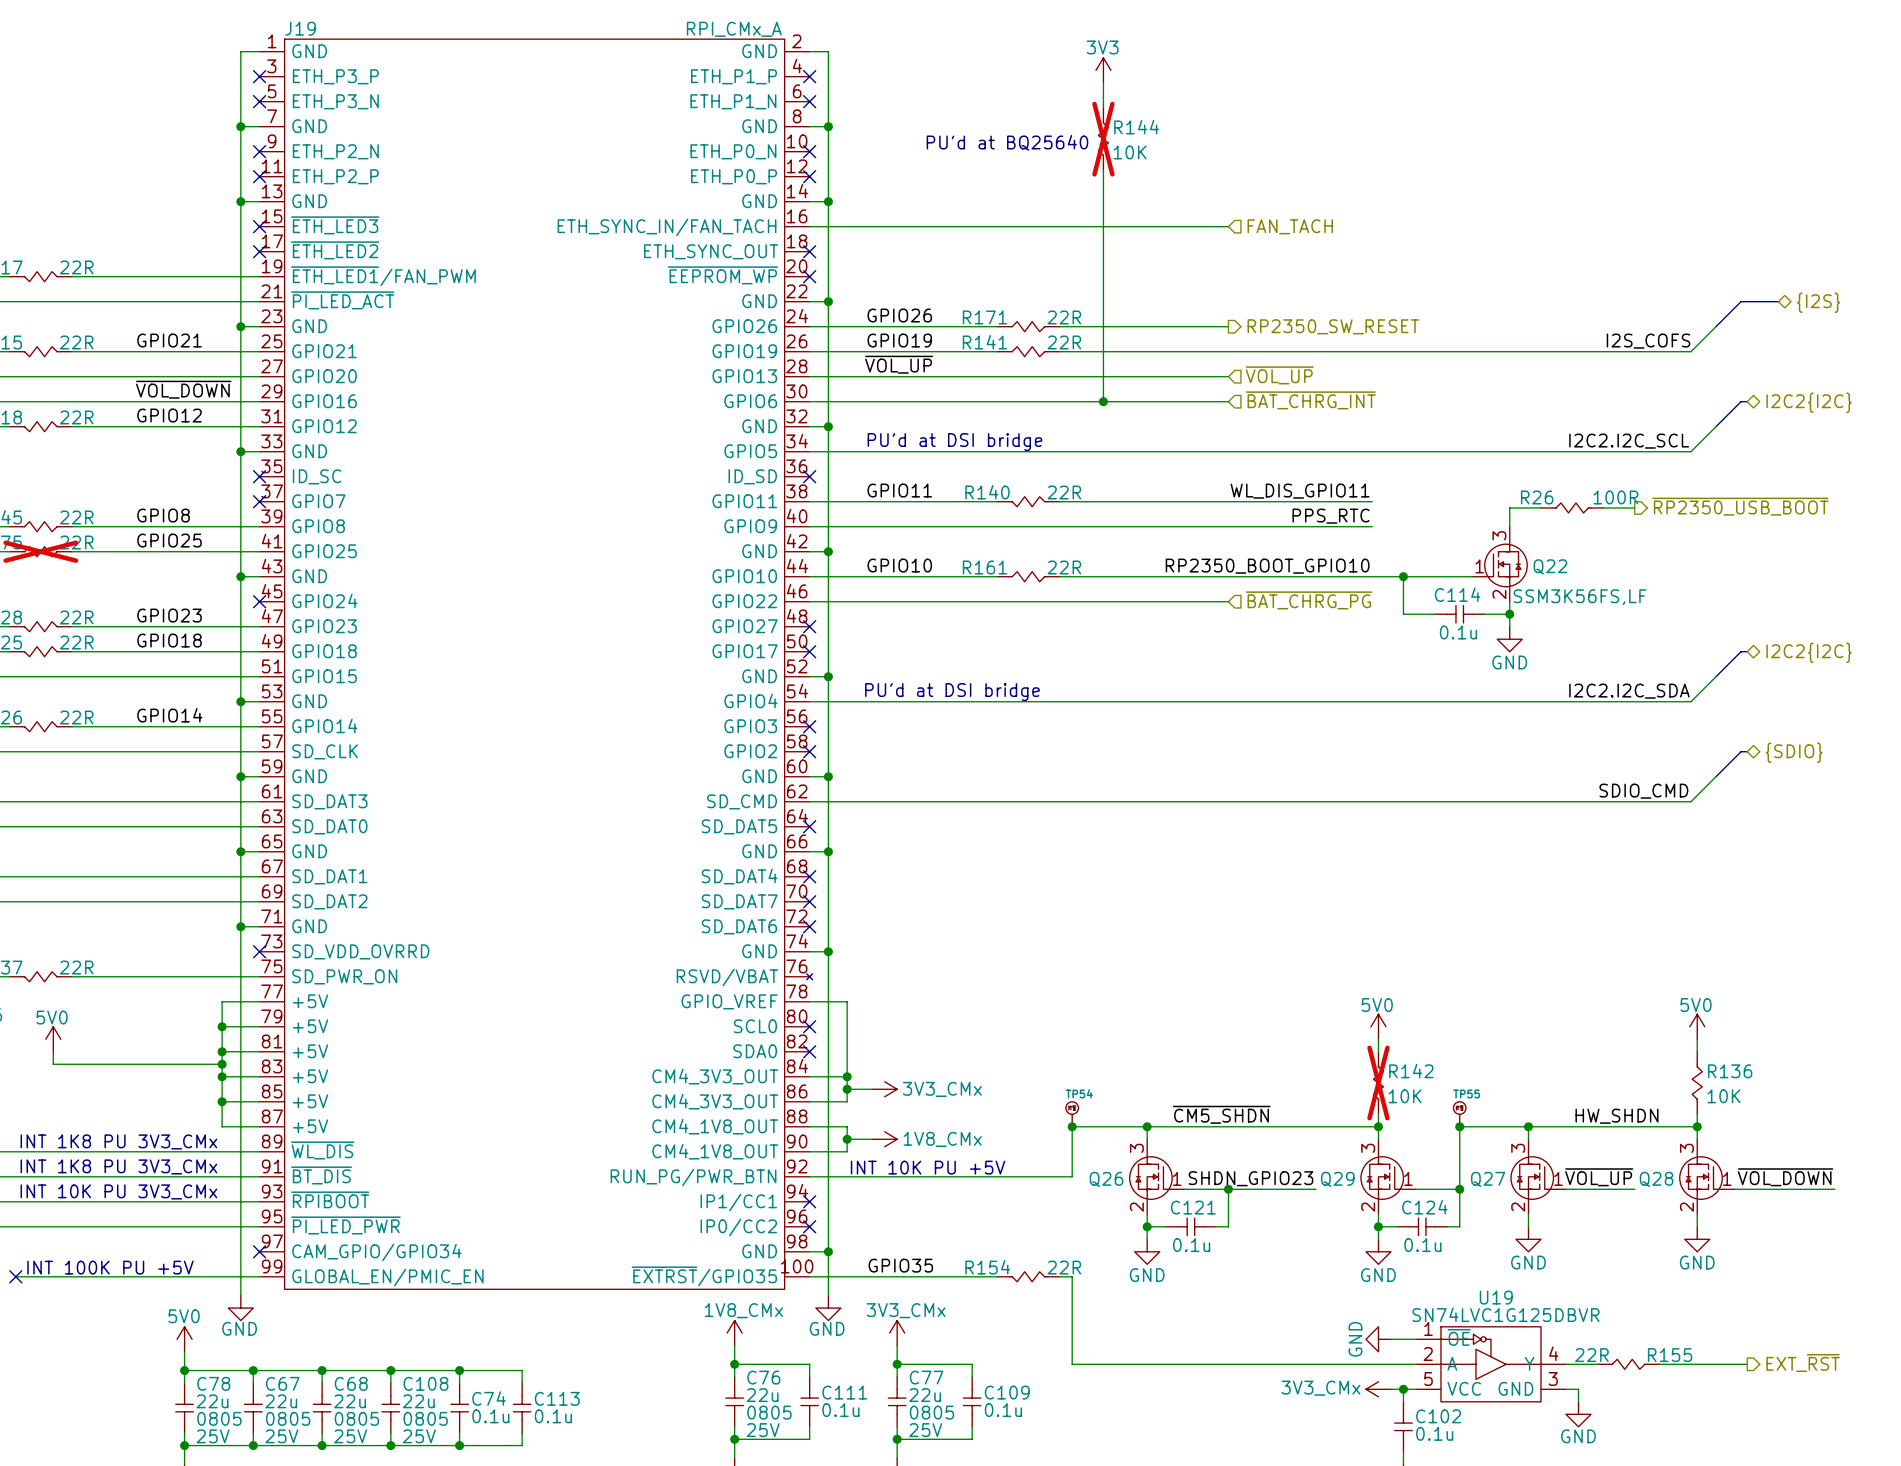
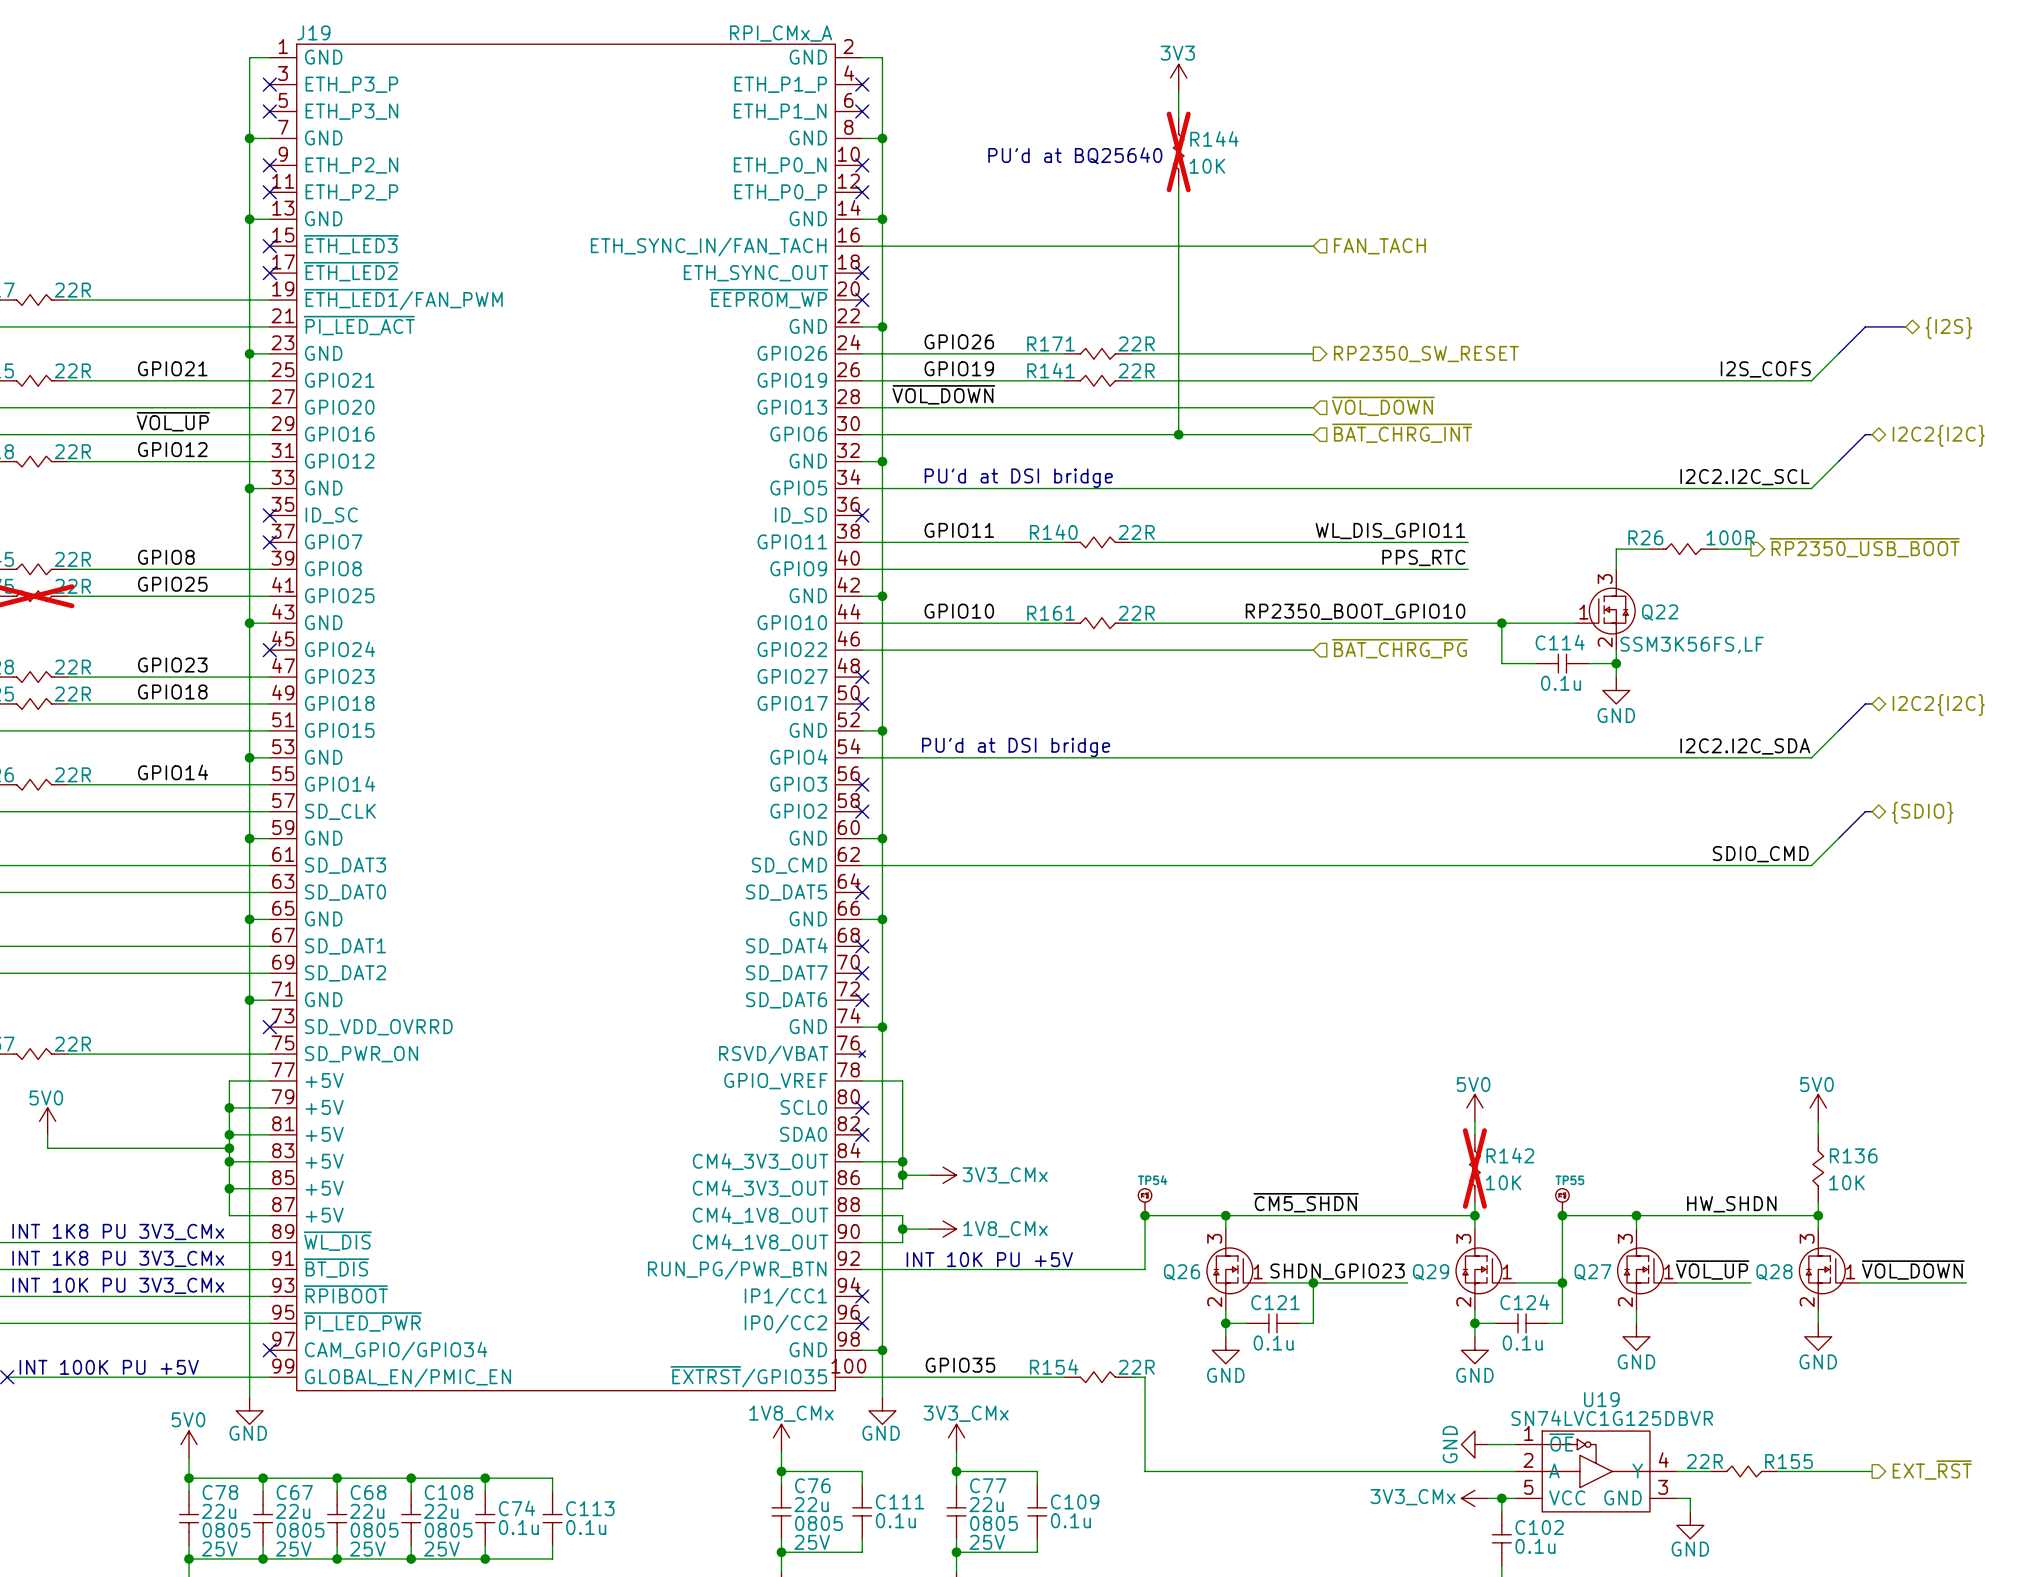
label: ~{VOL_UP} (899, 364) -> ~{VOL_DOWN} (943, 394)
hierarchical label: ~{VOL_UP} (1279, 375) -> ~{VOL_DOWN} (1383, 406)
label: ~{VOL_DOWN} (183, 389) -> ~{VOL_UP} (173, 421)

